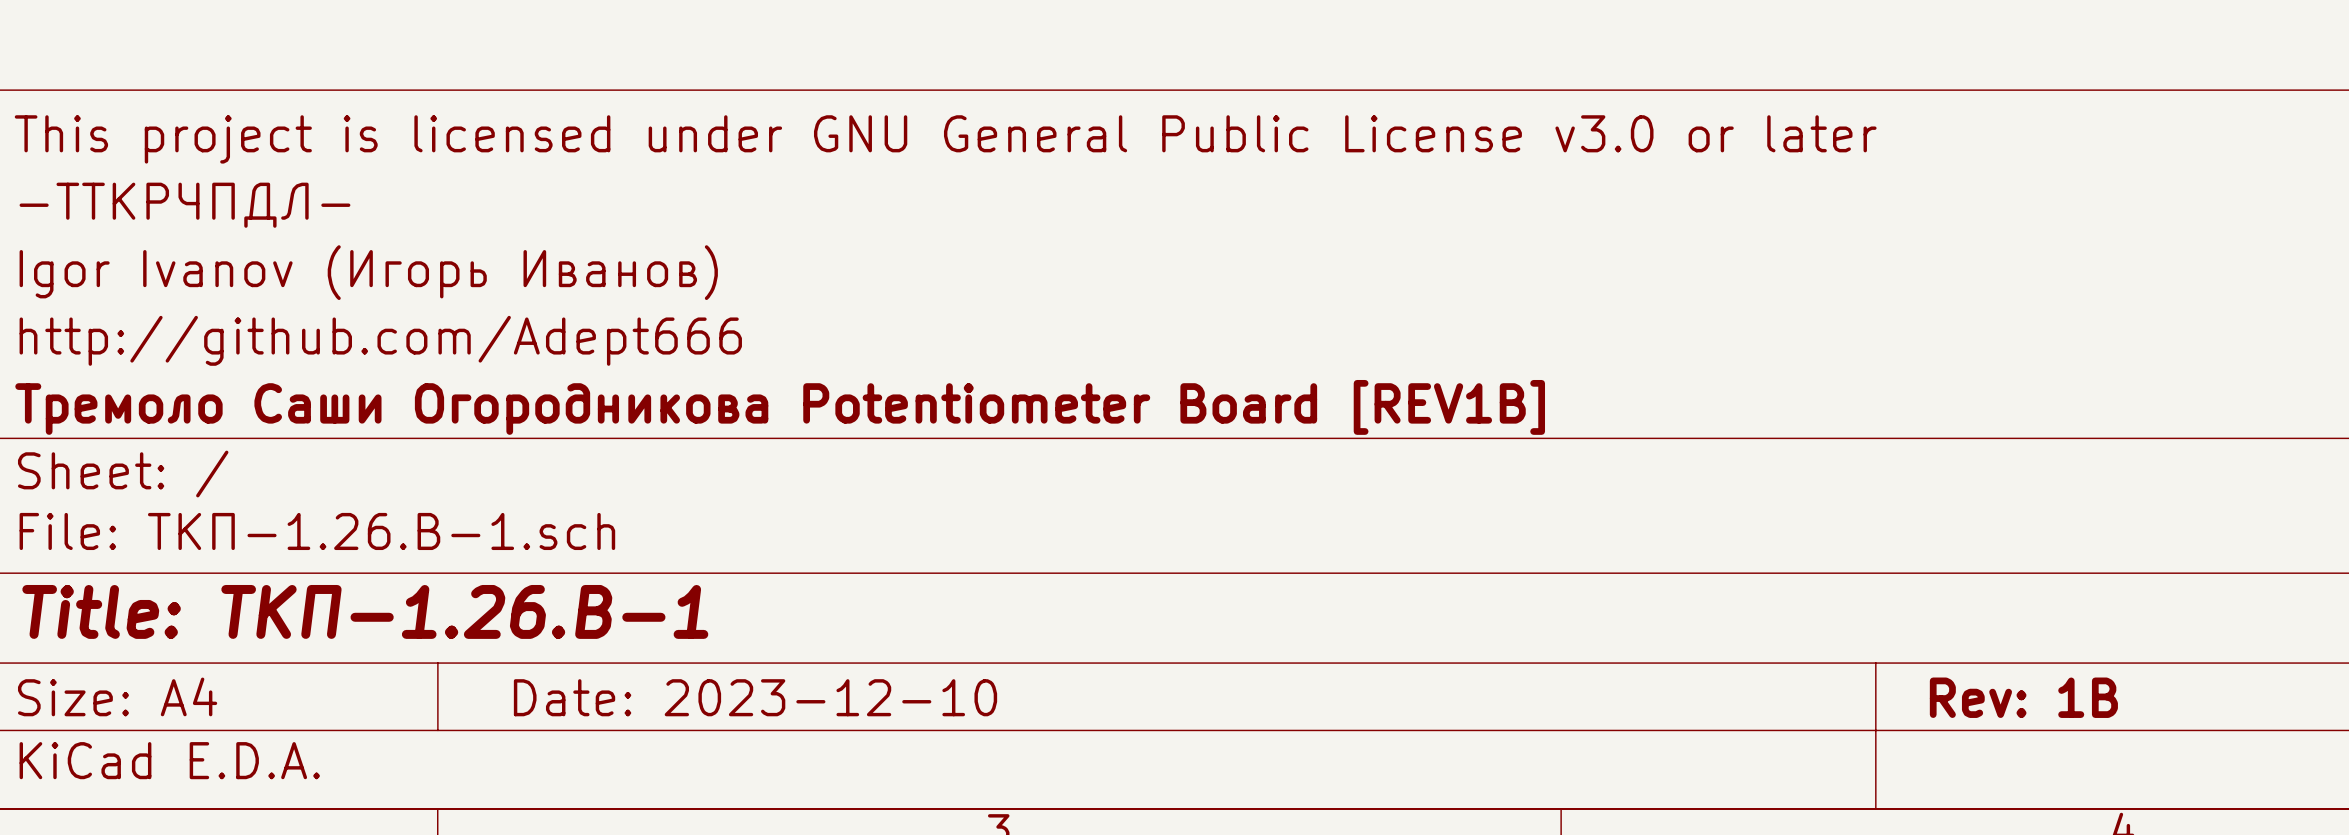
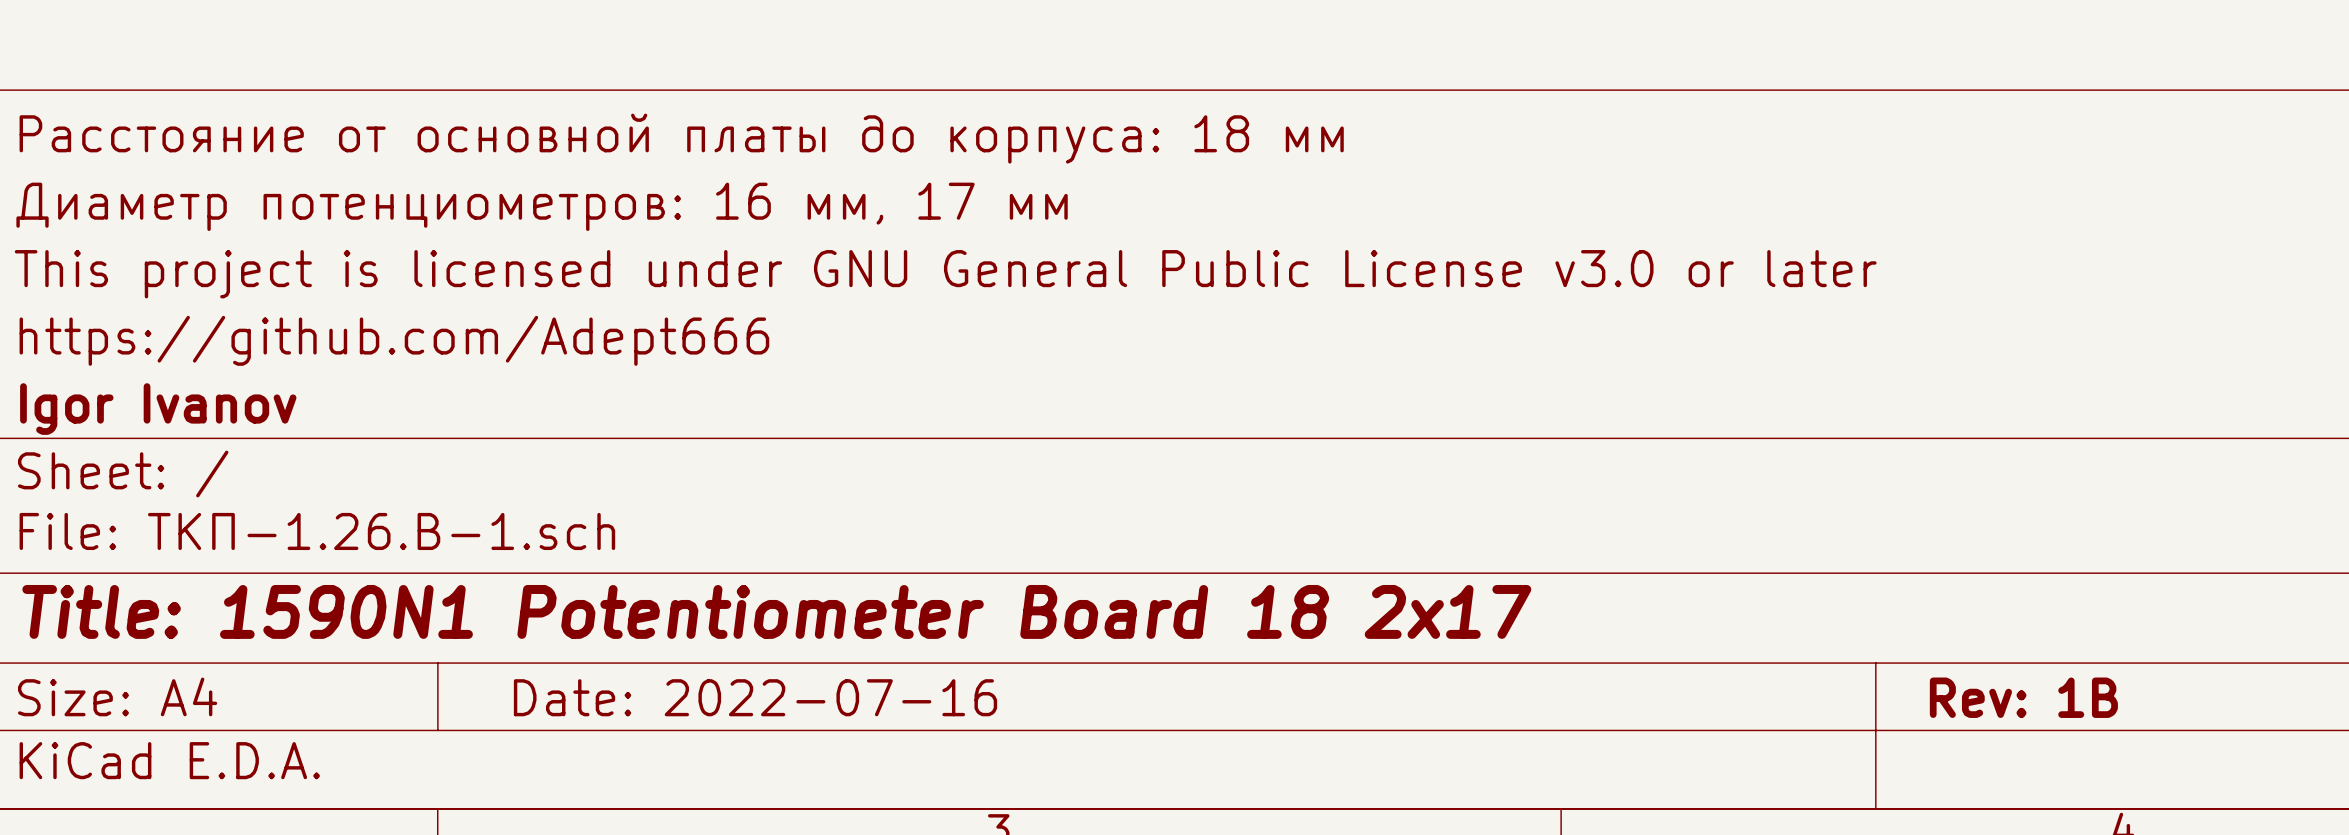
title block: This project is licensed under GNU General Public License v3.0 or later (945, 139) -> Расстояние от основной платы до корпуса: 18 мм (681, 138)
title block: -ТТКРЧПДЛ- (184, 205) -> Диаметр потенциометров: 16 мм, 17 мм (542, 206)
title block: Igor Ivanov (Игорь Иванов) (368, 272) -> This project is licensed under GNU General Public License v3.0 or later (945, 274)
title block: http://github.com/Adept666 (380, 340) -> https://github.com/Adept666 (394, 340)
title block: Тремоло Саши Огородникова Potentiometer Board [REV1B] (780, 407) -> Igor Ivanov (158, 409)
title block: Title: ТКП-1.26.B-1 (365, 611) -> Title: 1590N1 Potentiometer Board 18 2x17 (776, 611)
title block: Date: 2023-12-10 (755, 697) -> Date: 2022-07-16 (755, 697)

